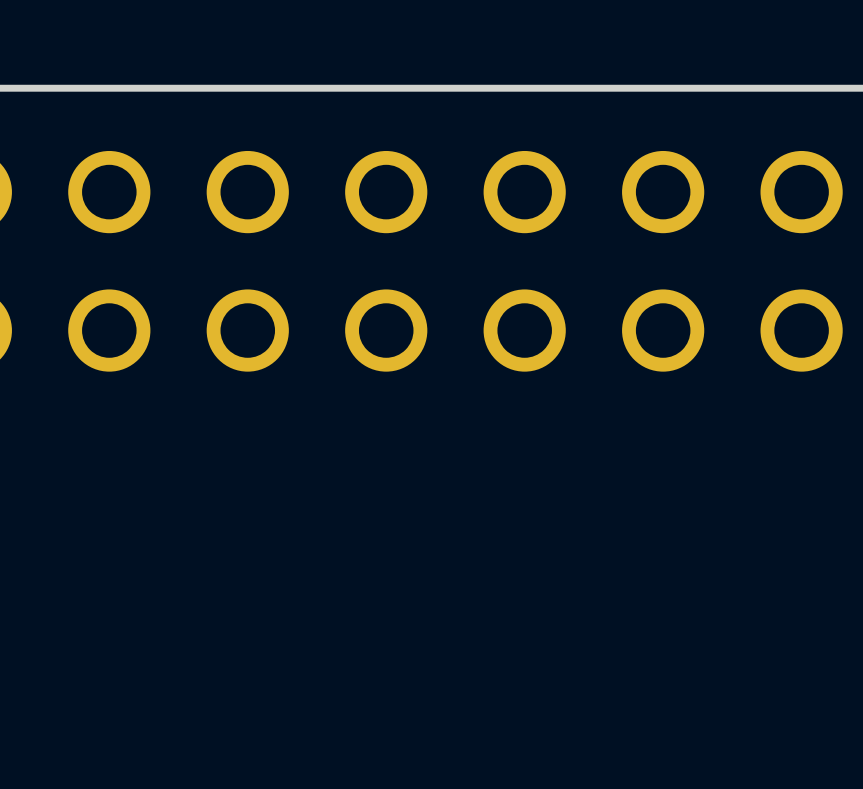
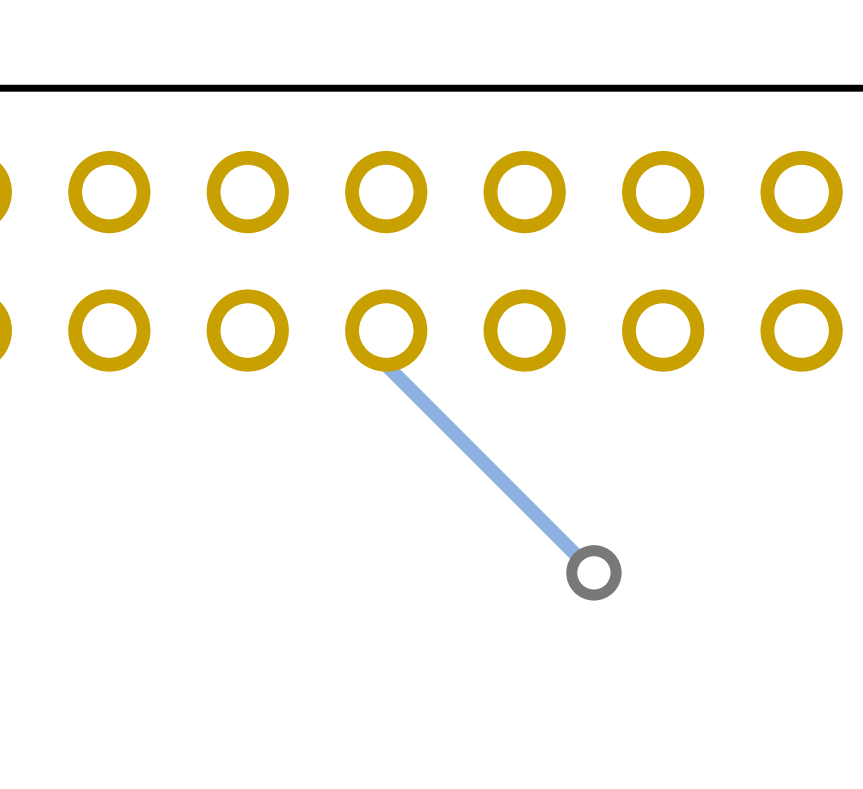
track: none -> (386, 330) (386, 365) (593, 572)
via: none -> (593, 572)

